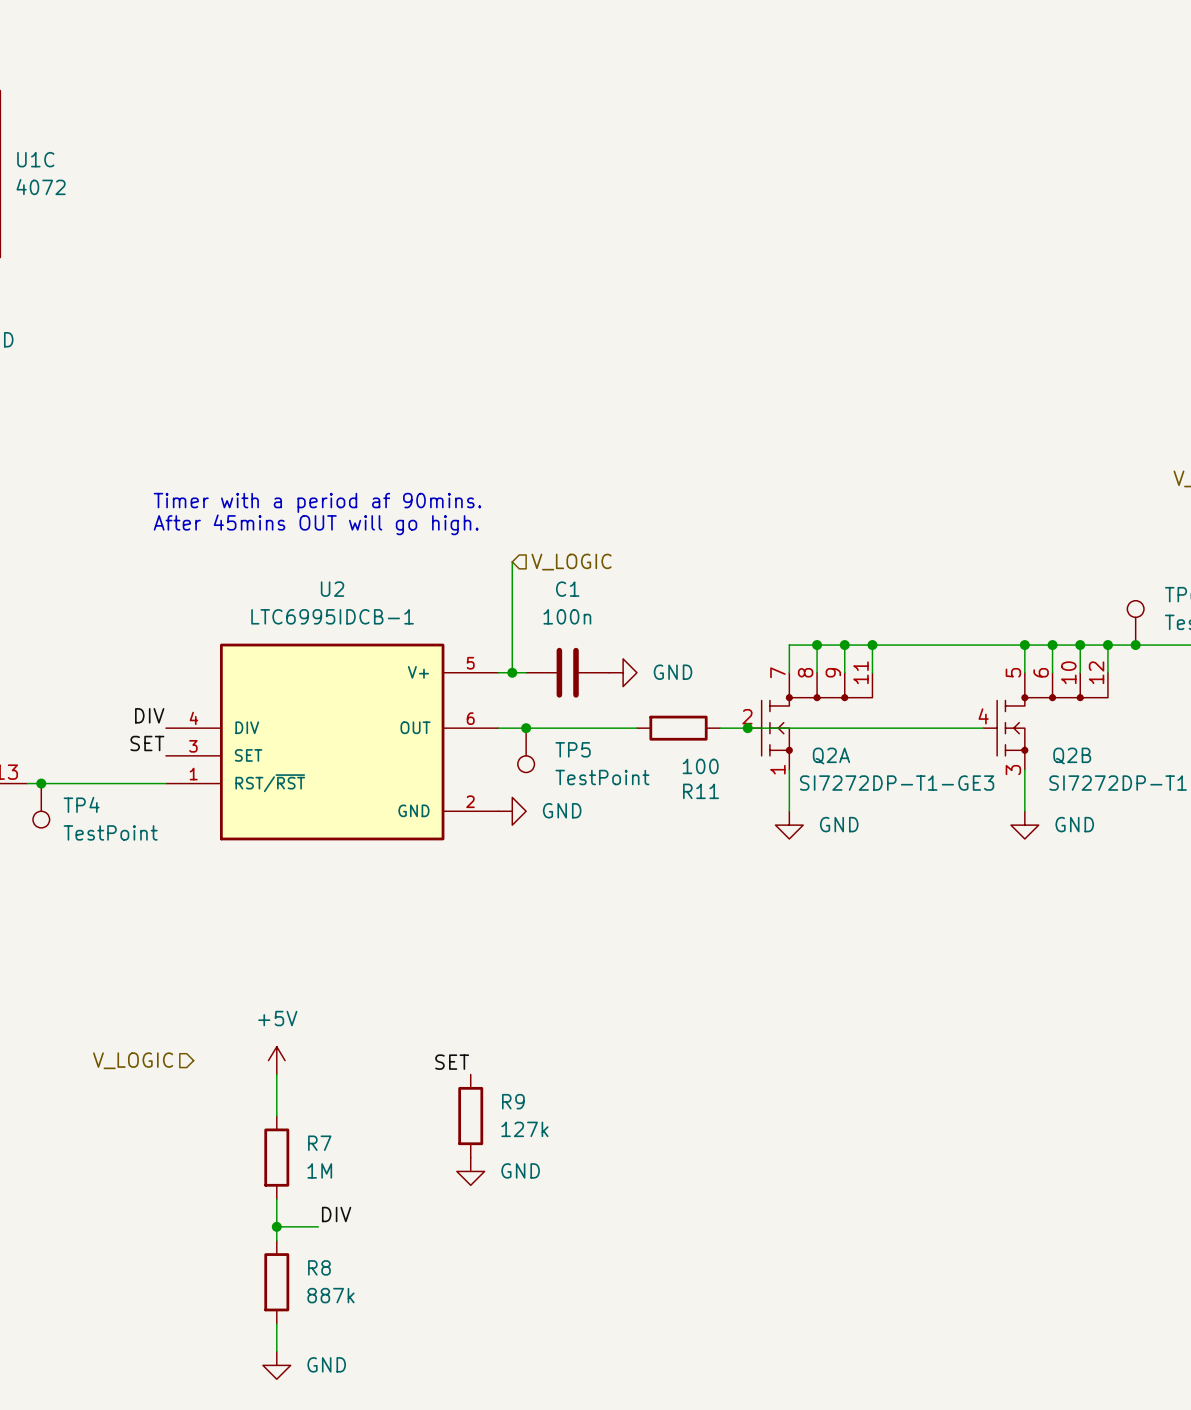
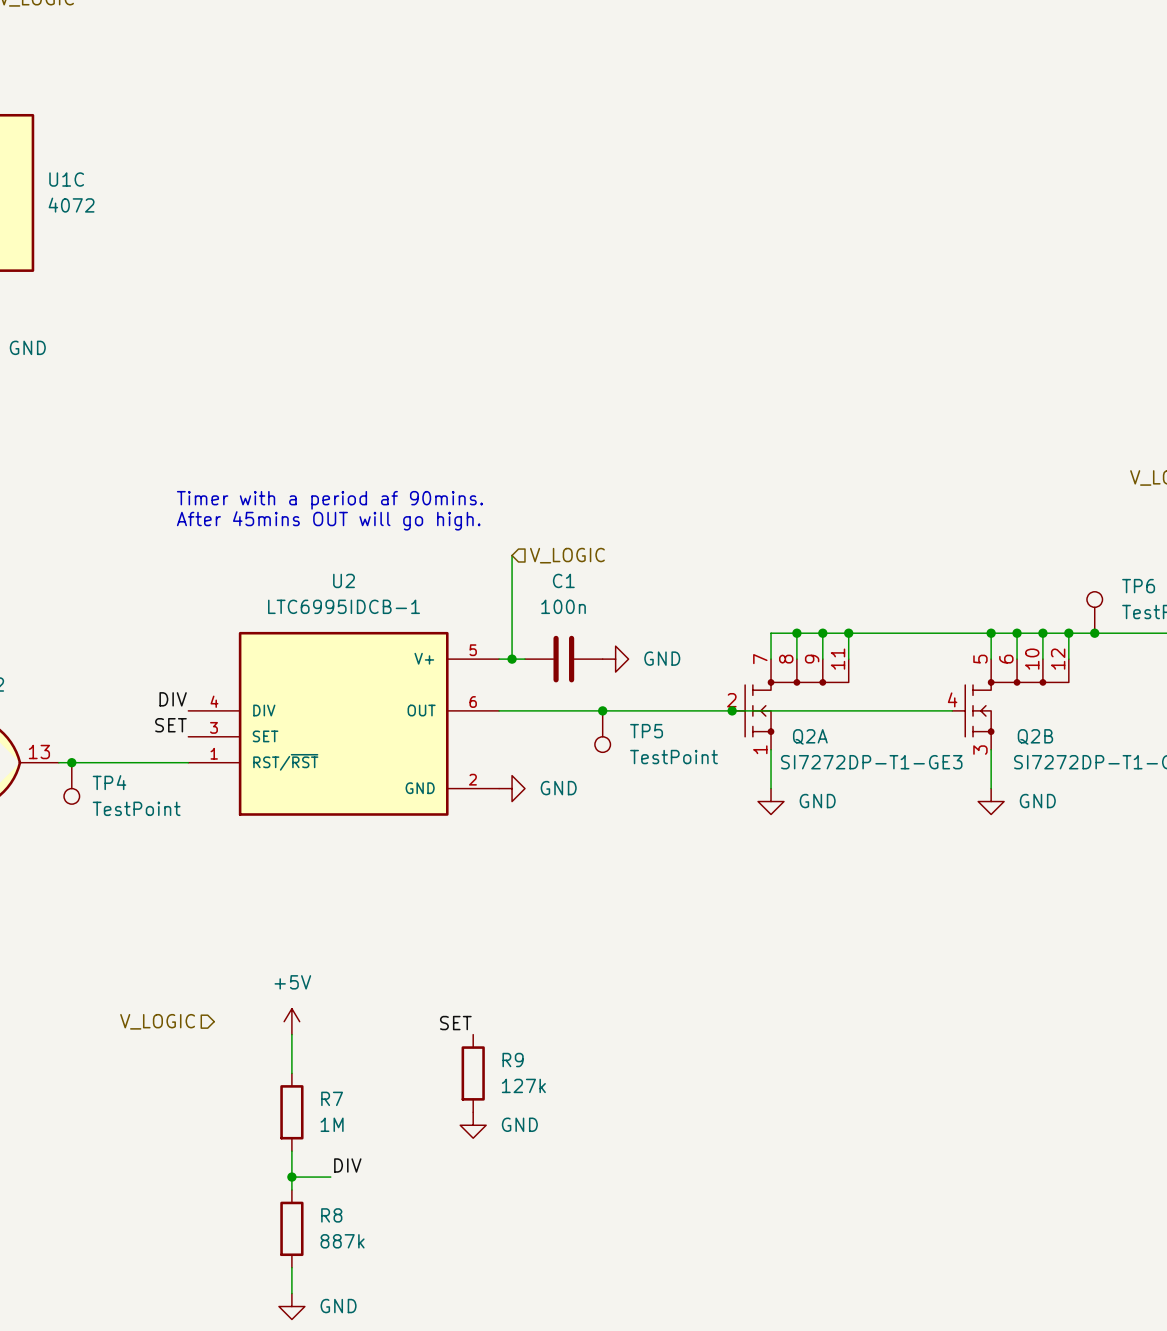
junction: (526, 728) -> none
junction: none -> (602, 710)
wire: none -> (628, 710) (706, 710)
R11: 100 (678, 728) -> none
TP5 position: (526, 750) -> (602, 731)

